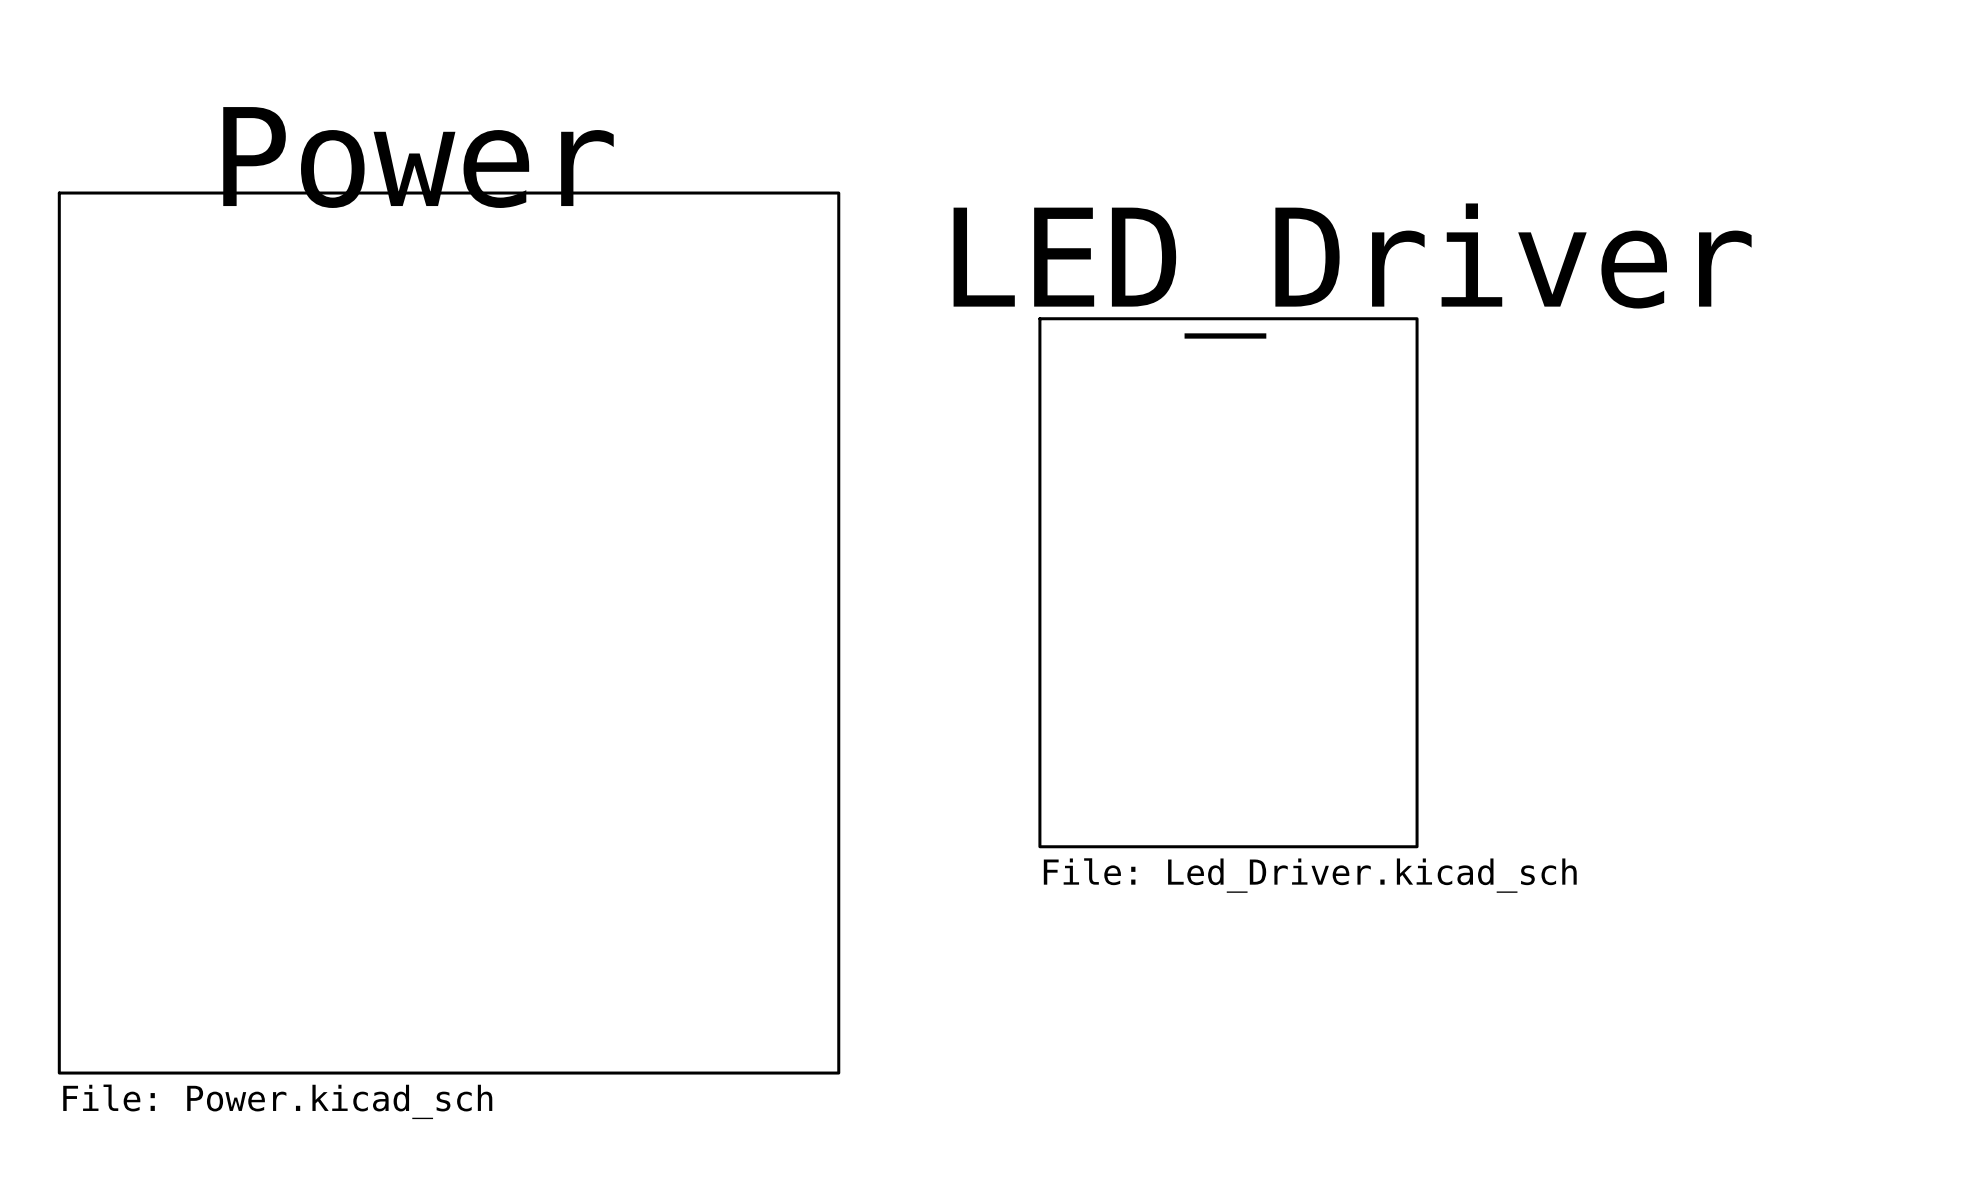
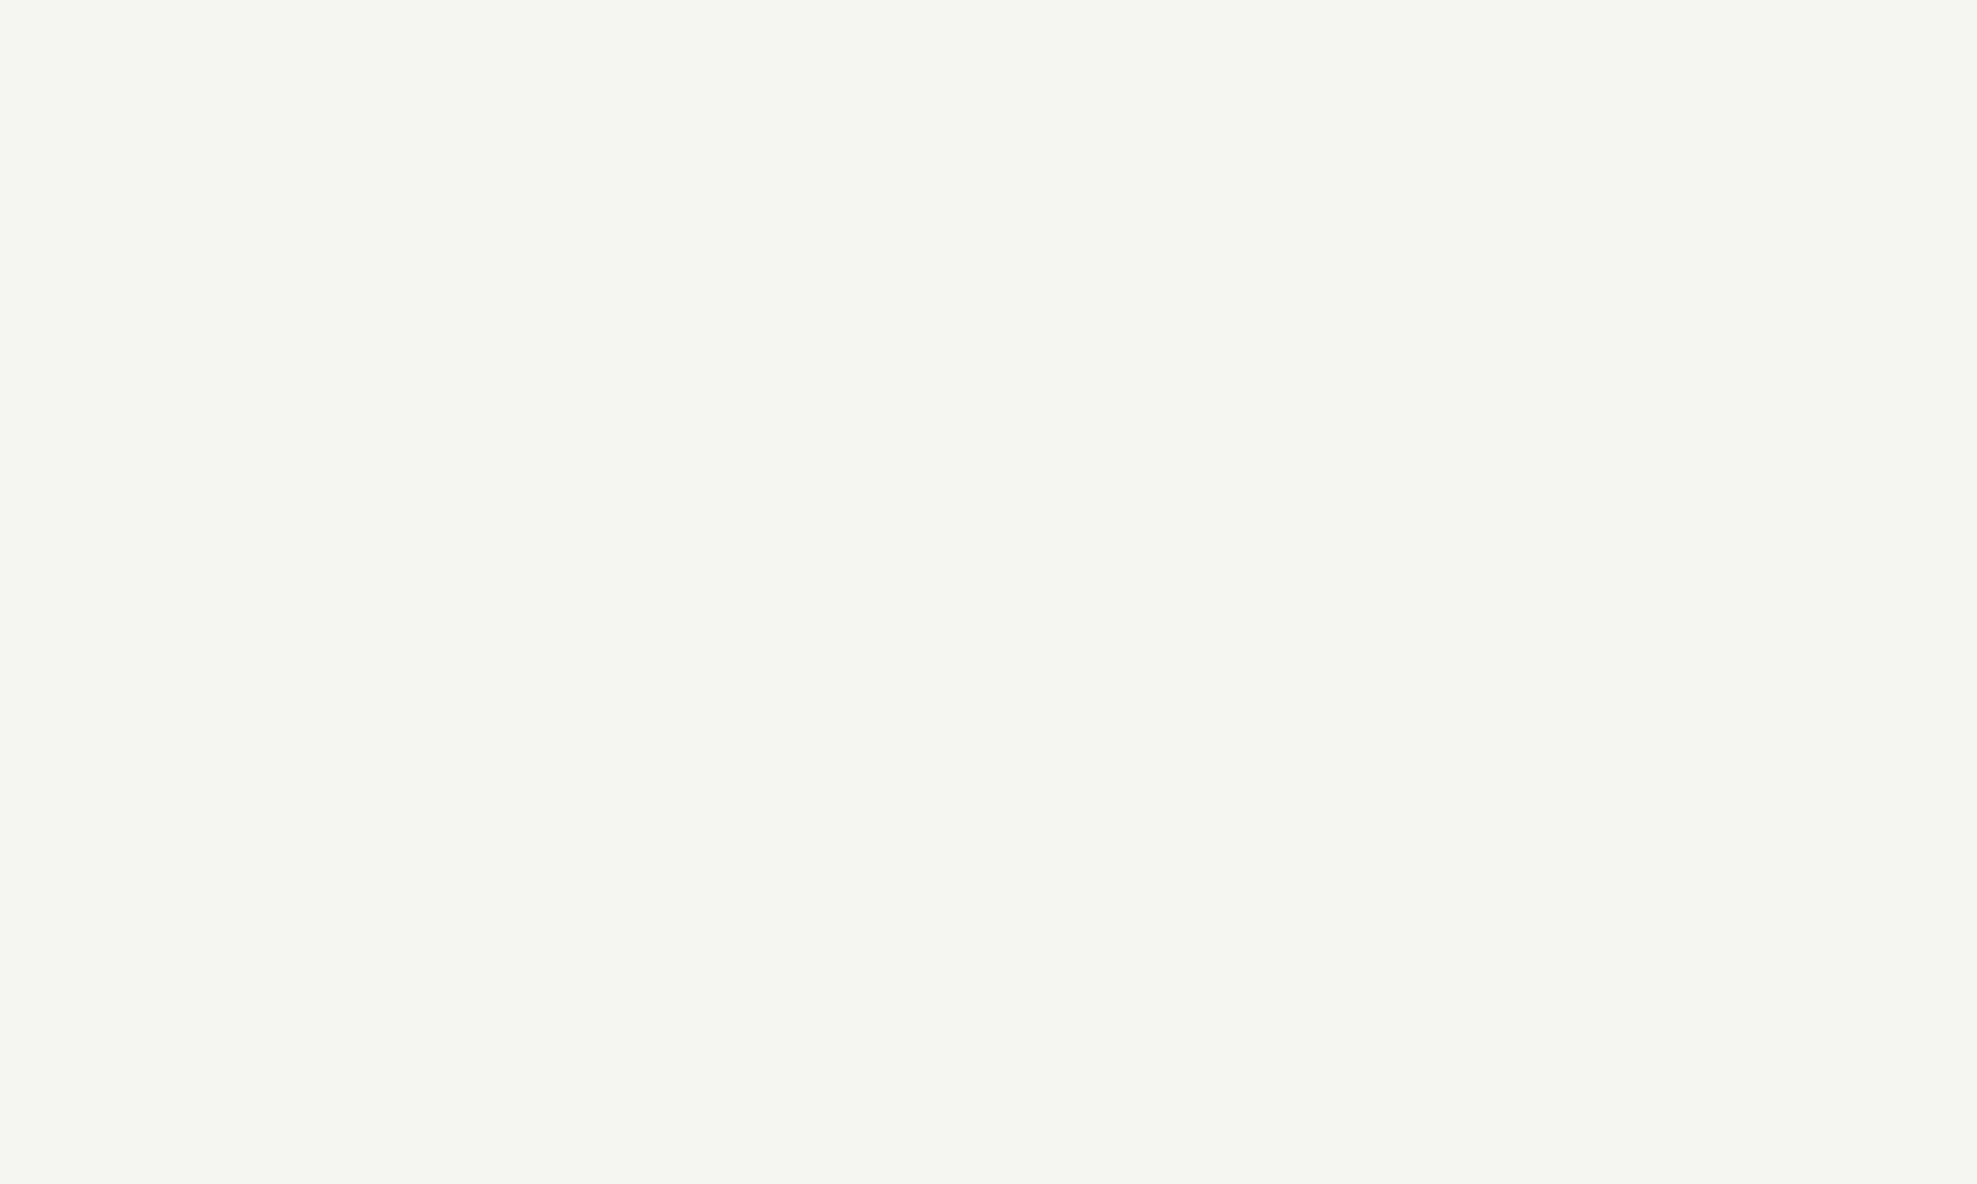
sheet LED_Driver: File: Led_Driver.kicad_sch (1228, 582) -> none
sheet Power: File: Power.kicad_sch (449, 633) -> none

